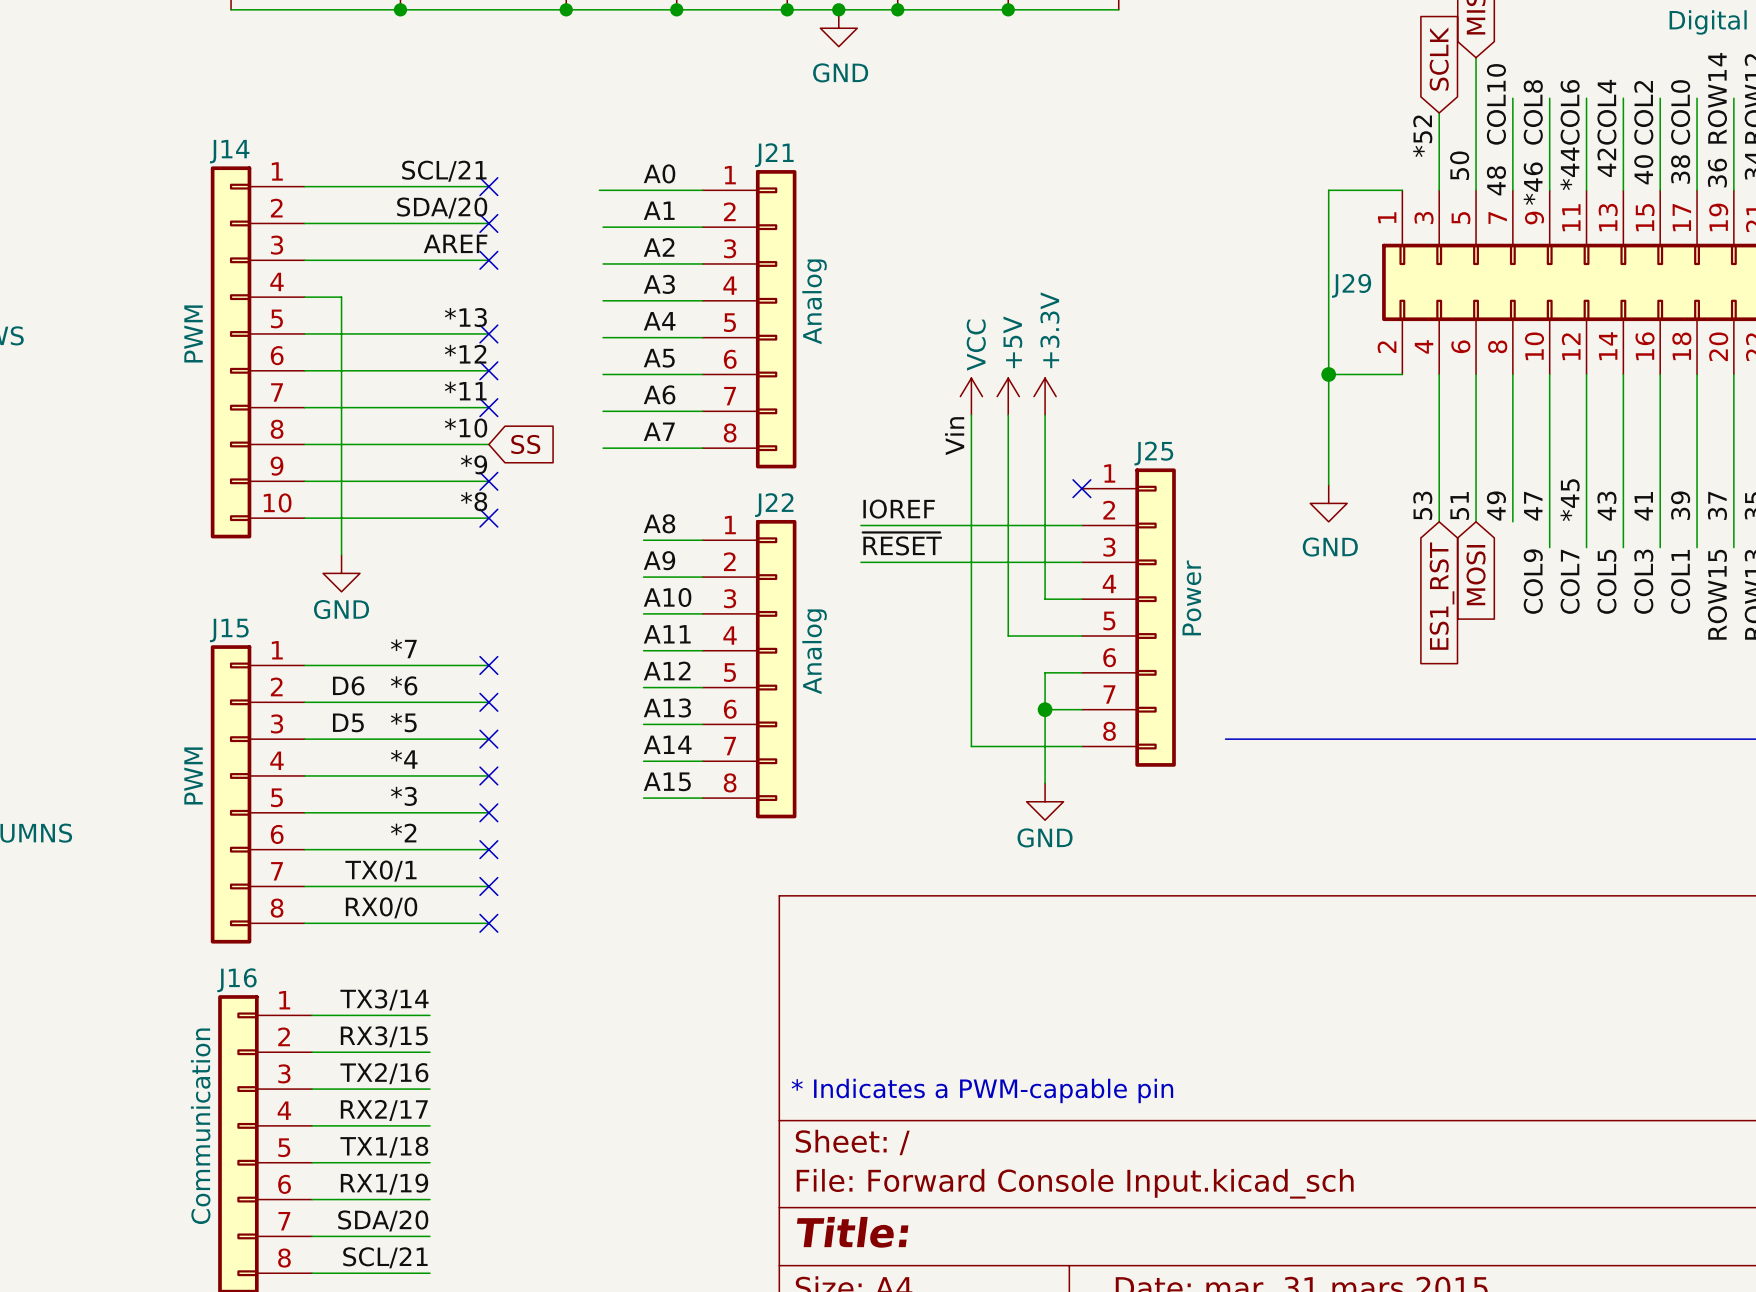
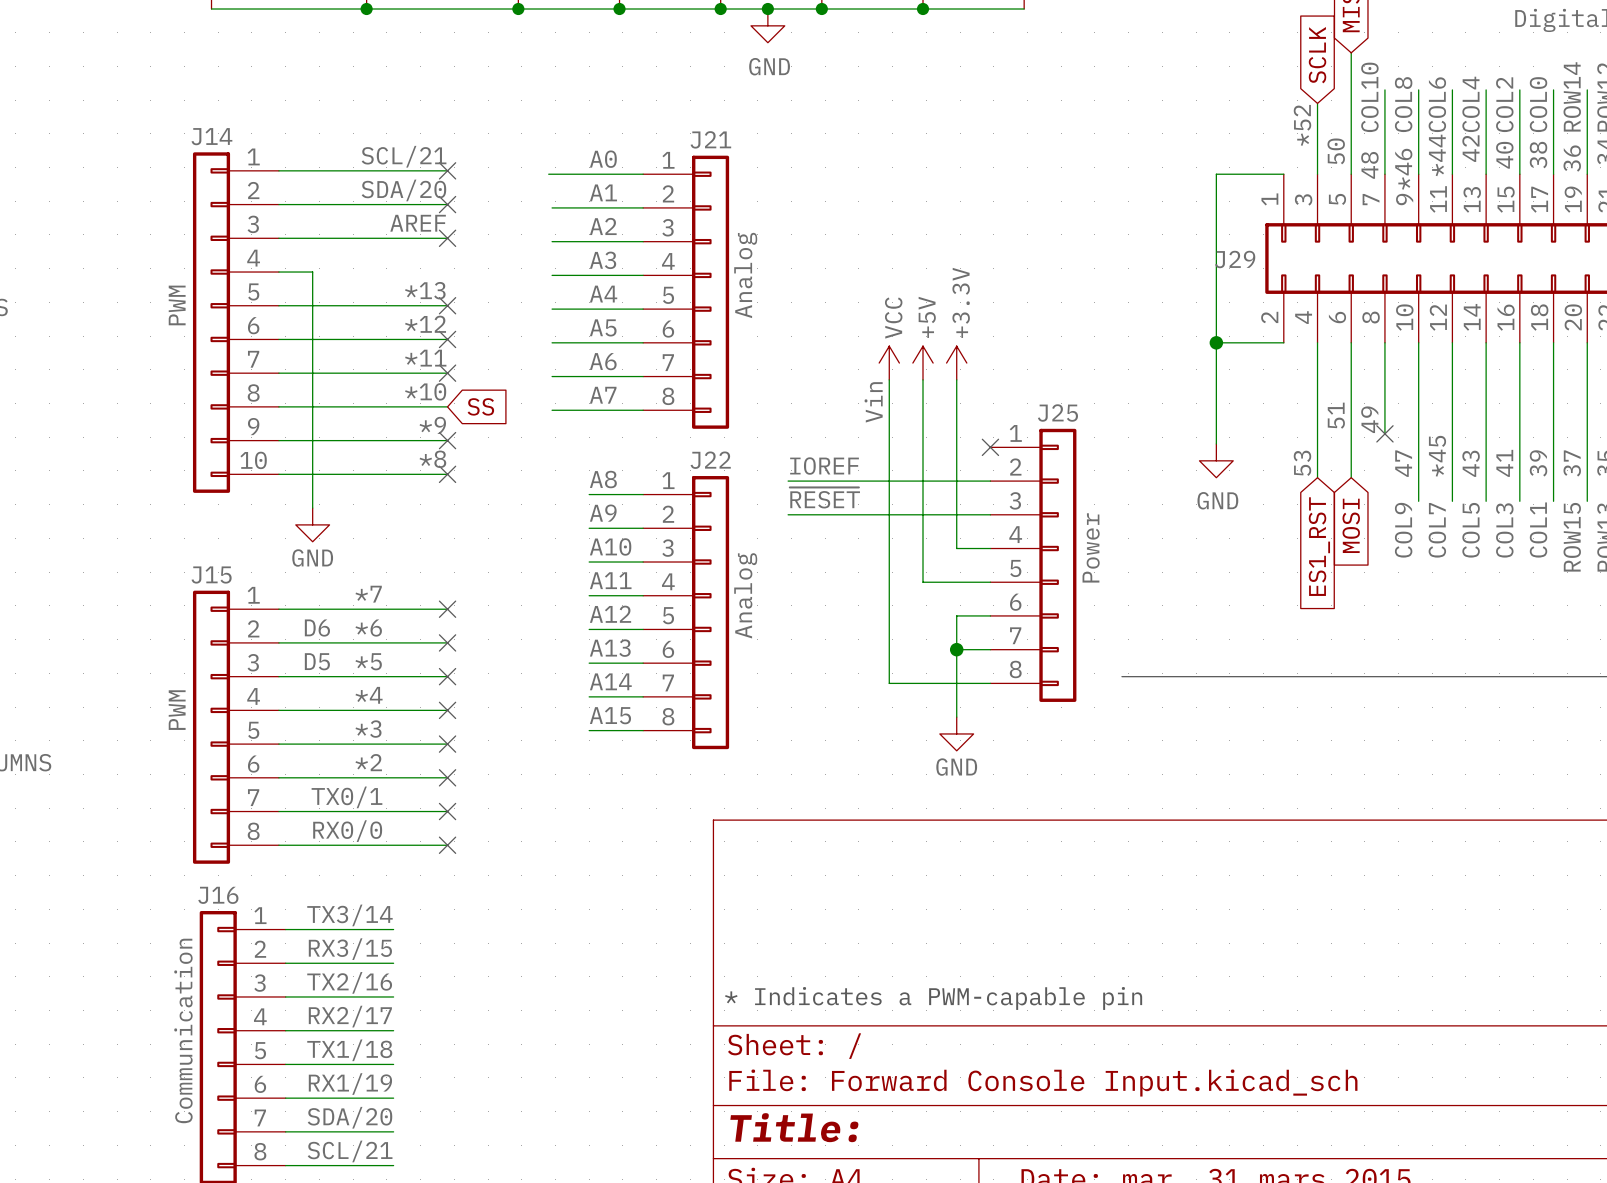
wire: (1512, 473) (1512, 521) -> none
no-connect mark: none -> (1384, 433)
label position: 51 (1459, 505) -> 51 (1336, 415)
label position: 49 (1496, 506) -> 49 (1369, 419)

